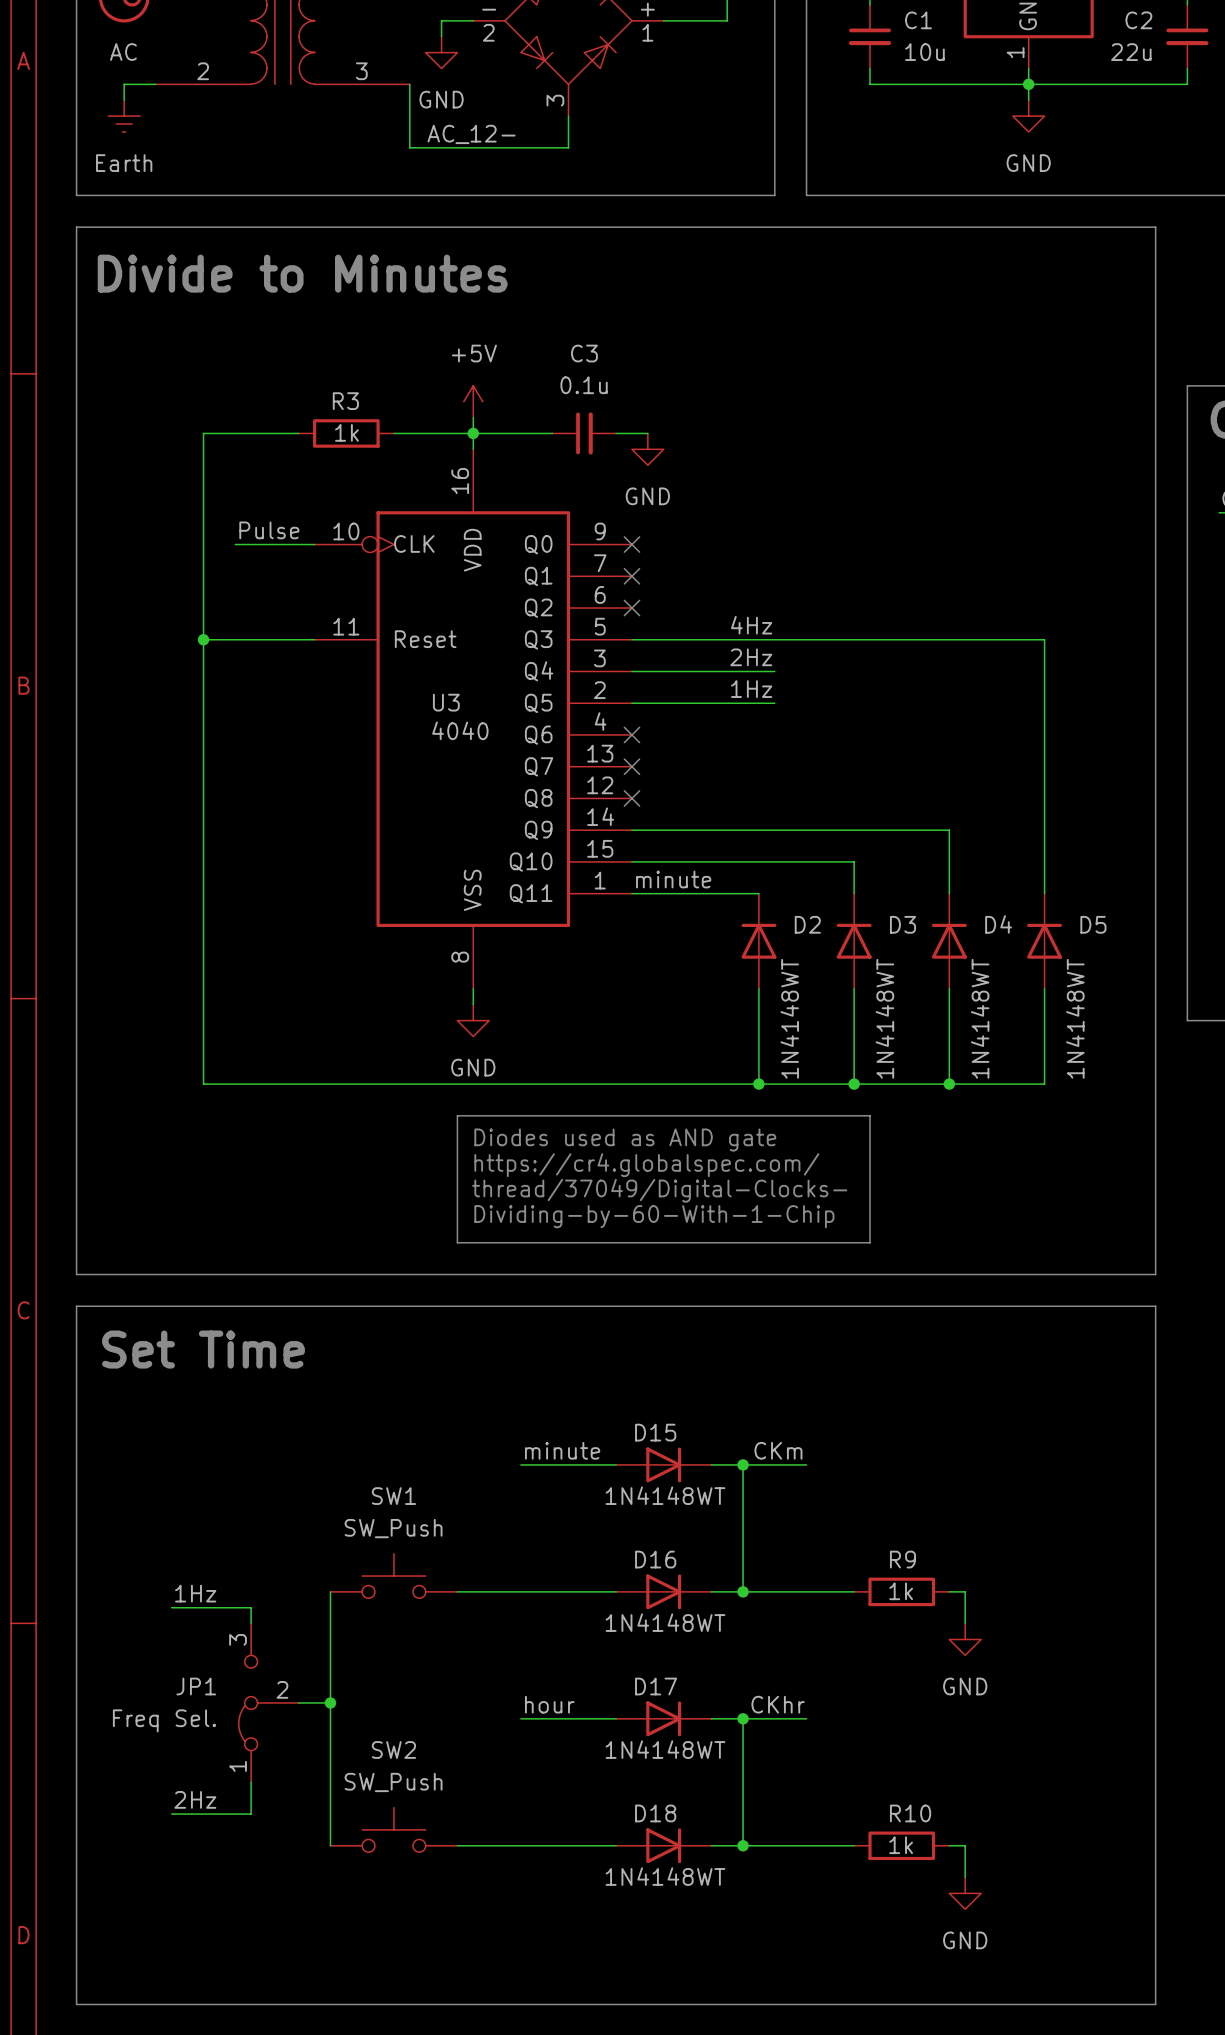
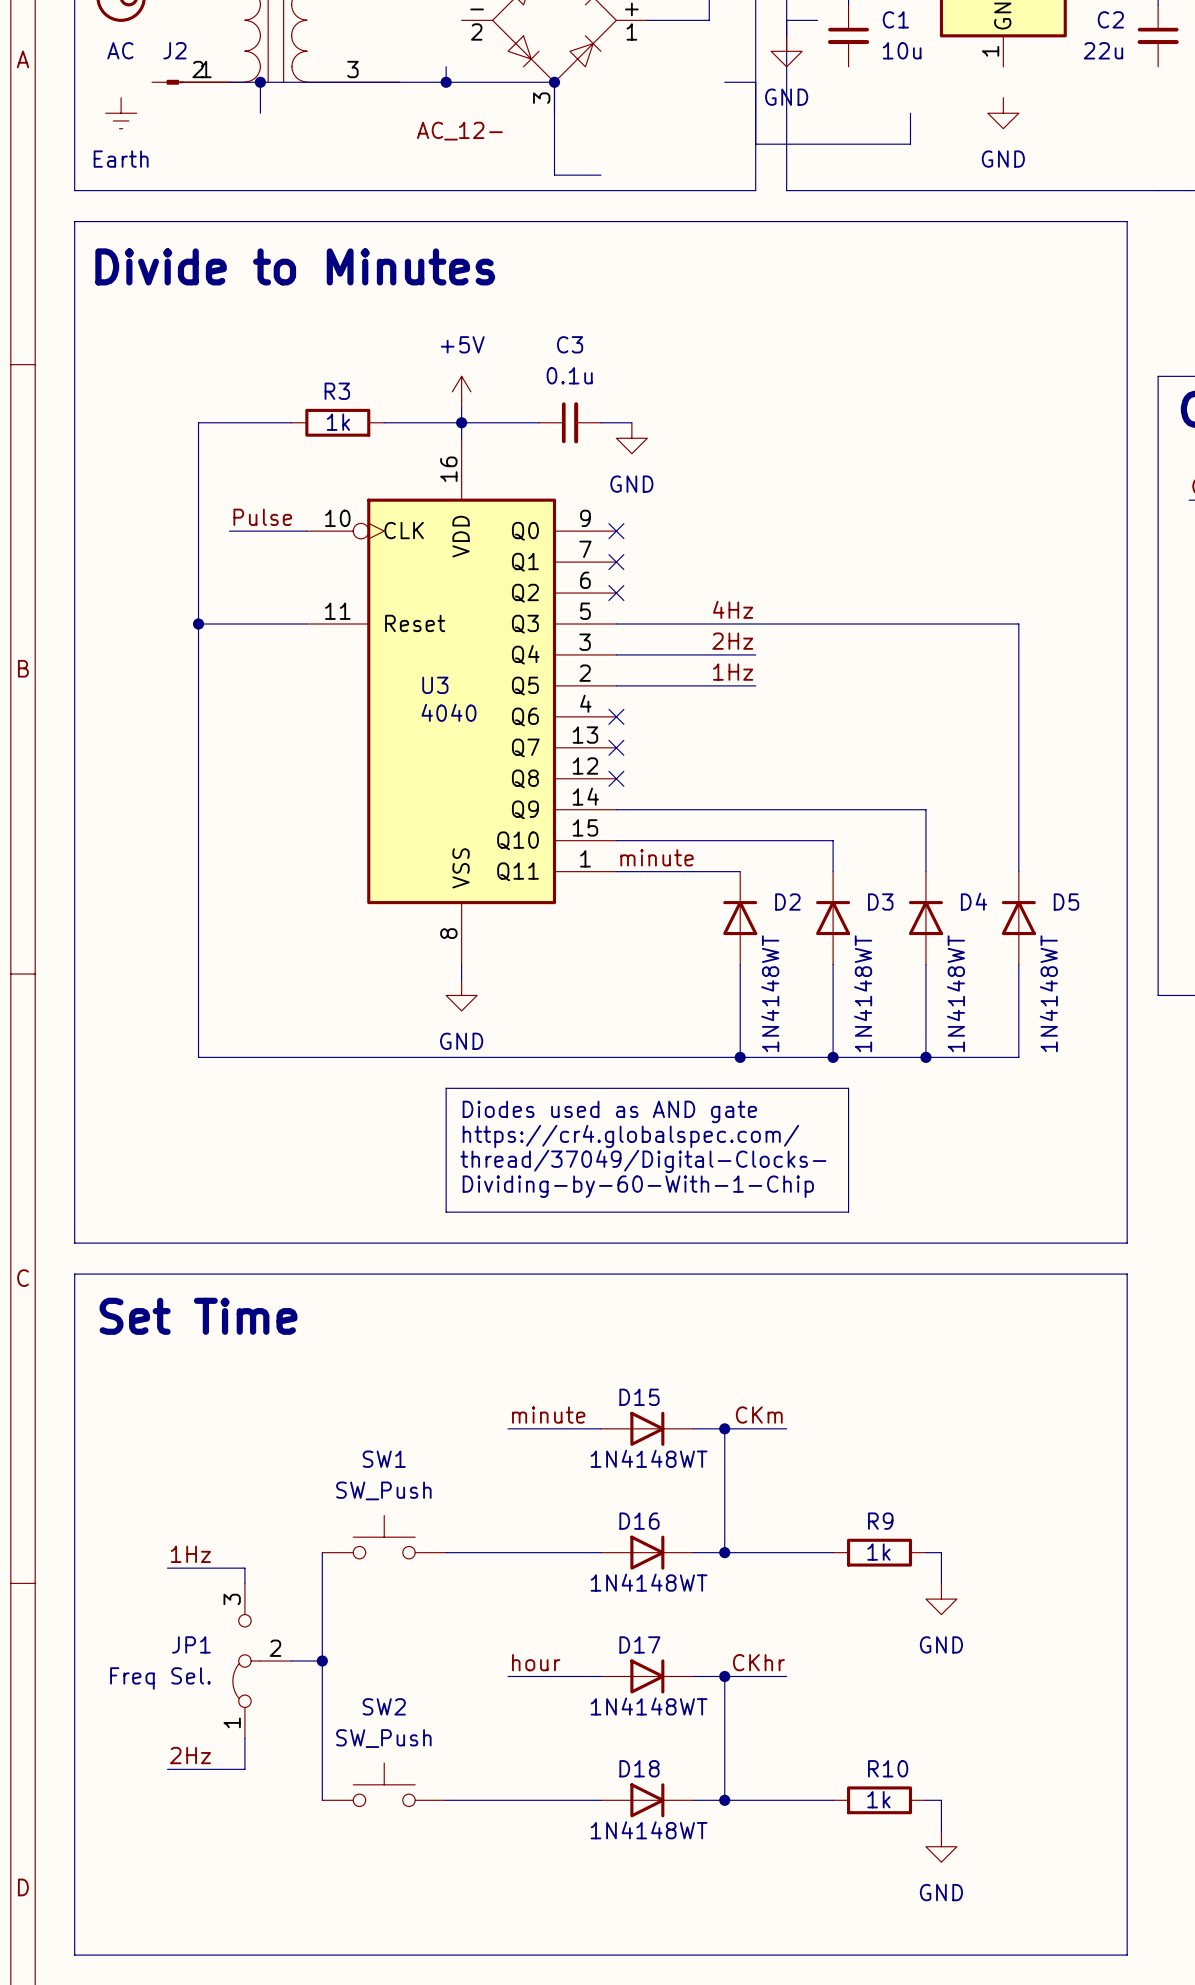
wire: (473, 20) (441, 20) (441, 36) -> none
wire: none -> (817, 20) (786, 20) (786, 35)
power symbol: GND (441, 52) -> none
power symbol: none -> GND (786, 51)
wire: none -> (446, 66) (446, 82)
wire: (870, 68) (870, 84) (1187, 84) (1187, 68) -> none
wire: (1028, 68) (1028, 100) -> none
wire: (155, 84) (124, 84) (124, 100) -> none
J2: none -> (198, 82)
wire: none -> (229, 82) (554, 82) (554, 113)
wire: none -> (260, 82) (260, 113)
junction: none -> (260, 82)
wire: (409, 84) (409, 147) (568, 147) -> (600, 175) (554, 175) (554, 144)
junction: none -> (446, 82)
junction: none -> (554, 82)
wire: none -> (724, 82) (755, 82) (755, 144) (910, 144) (910, 113)
junction: (1028, 84) -> none

